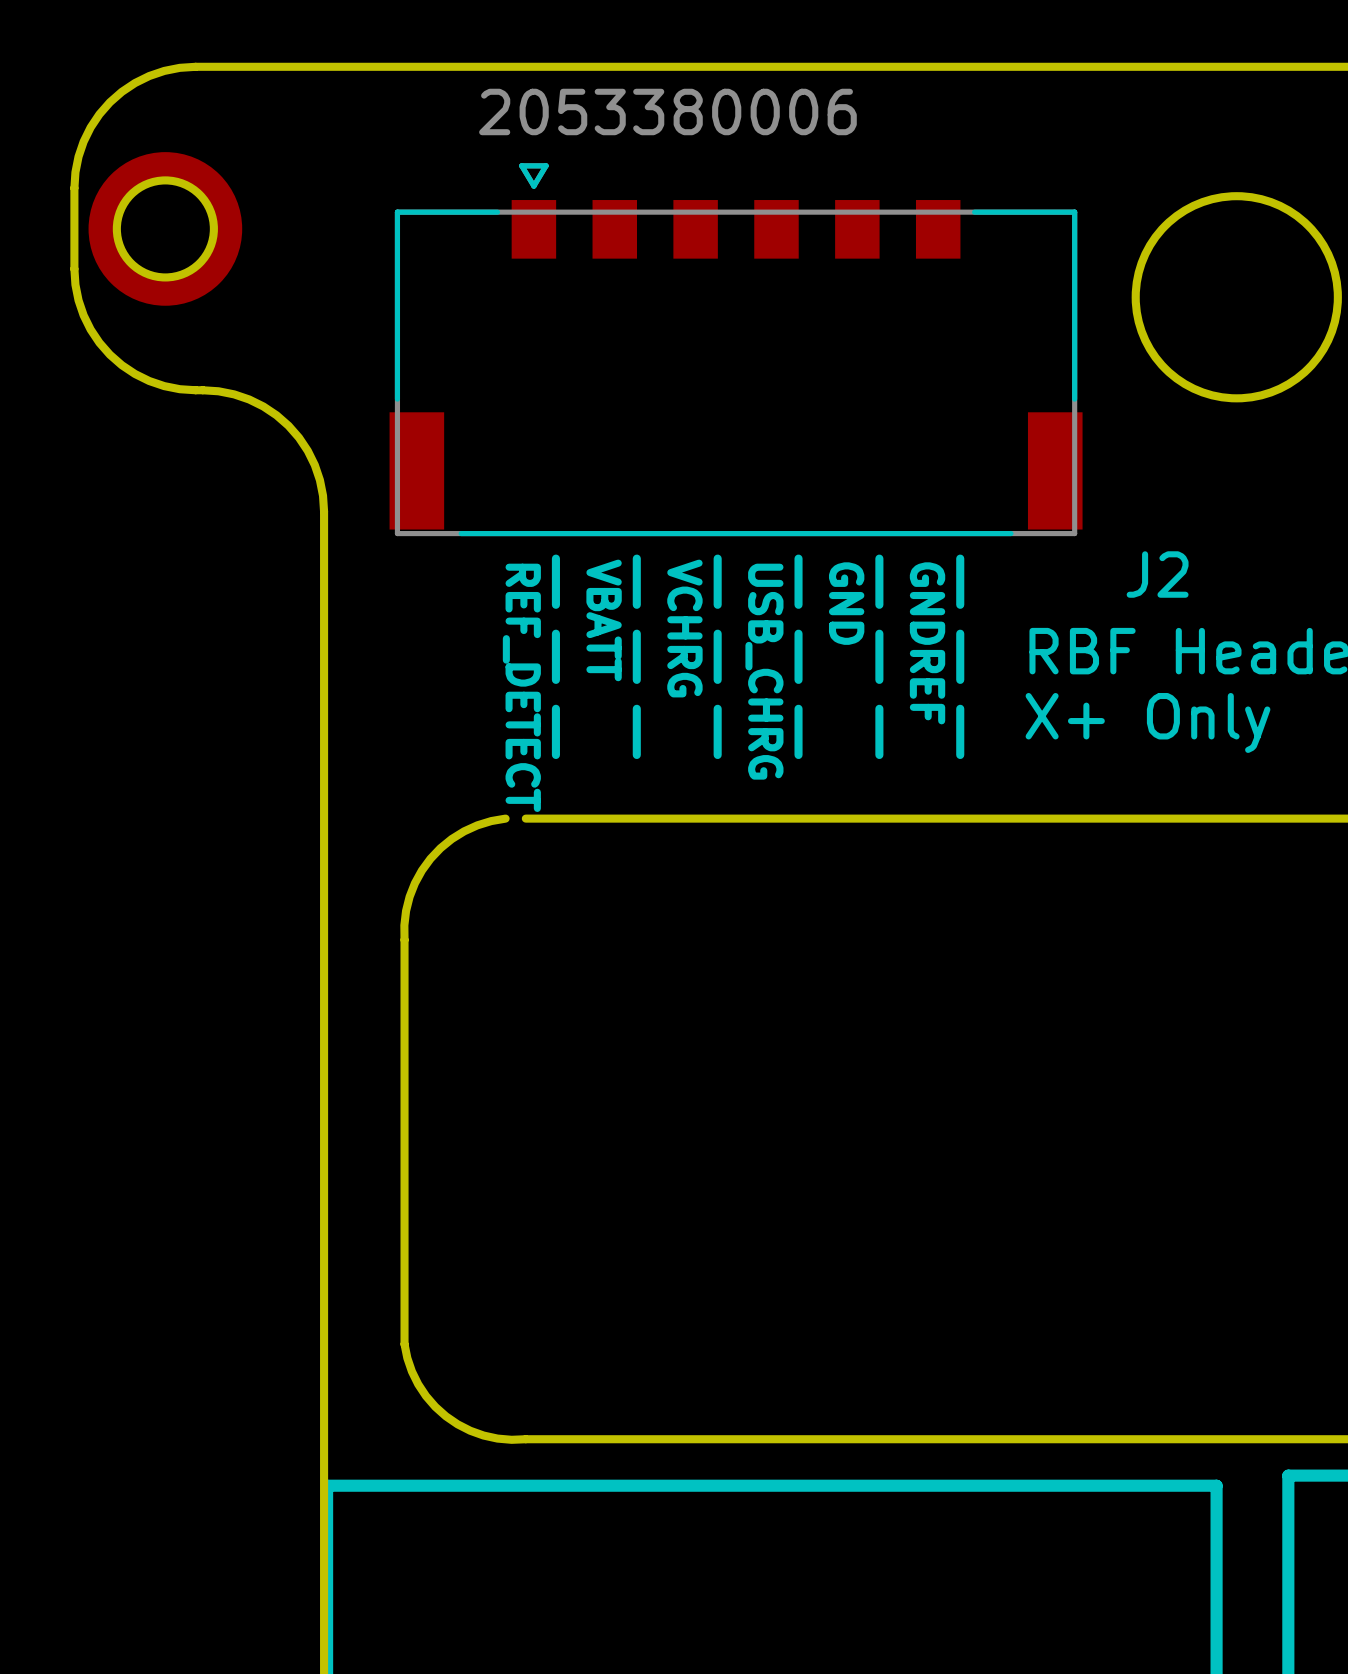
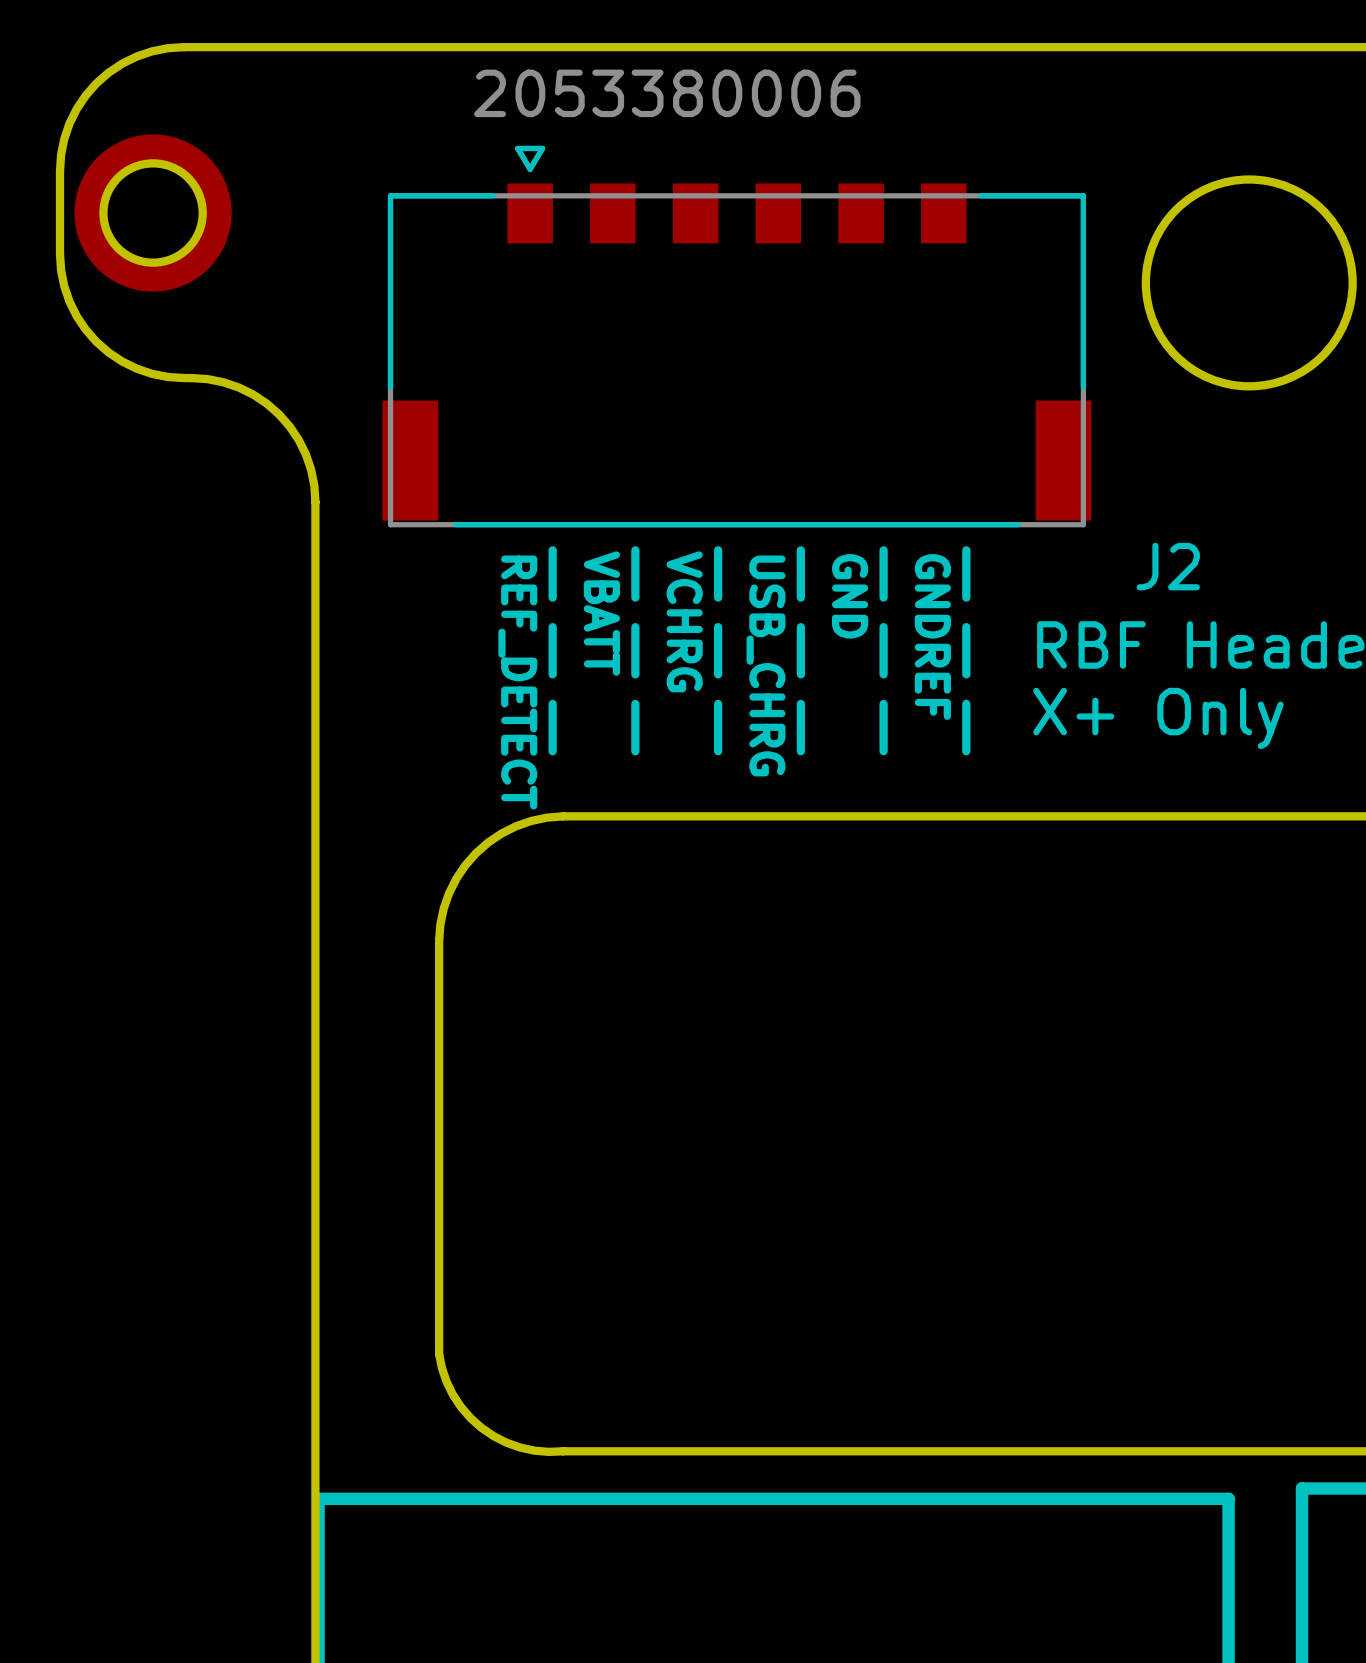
board edge: (505, 818) (477, 825) (451, 839) (440, 848) (421, 870) (409, 896) (406, 910) (404, 925) (404, 1344) (411, 1371) (426, 1396) (435, 1406) (457, 1424) (470, 1430) (497, 1438) (566, 1439) -> (563, 816) (531, 820) (516, 826) (488, 842) (476, 853) (465, 865) (449, 893) (440, 924) (439, 940) (439, 1354) (442, 1368) (453, 1395) (461, 1407) (470, 1418) (493, 1436) (506, 1442) (534, 1450) (563, 1451)
board edge: (525, 818) (566, 818) -> none

